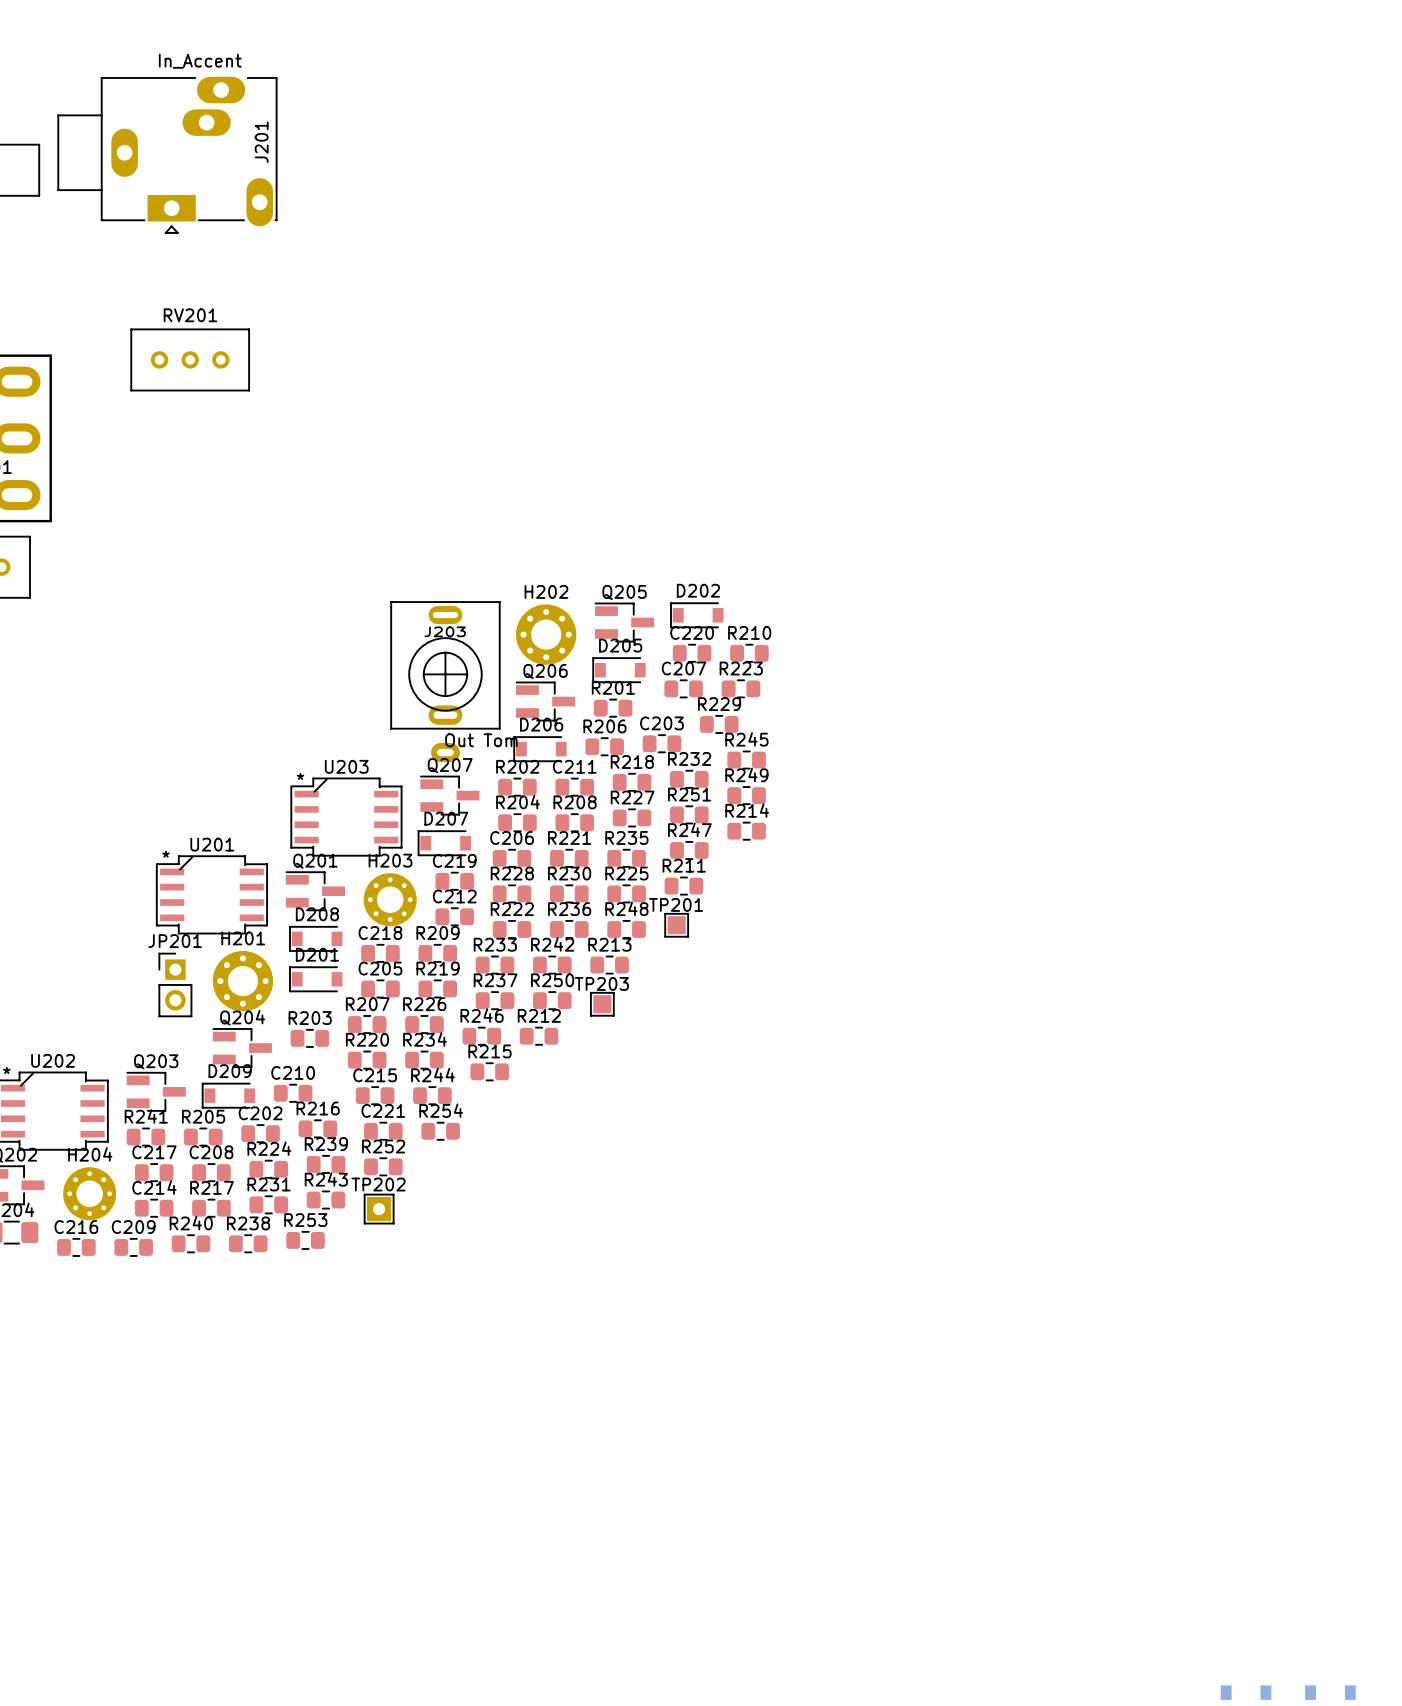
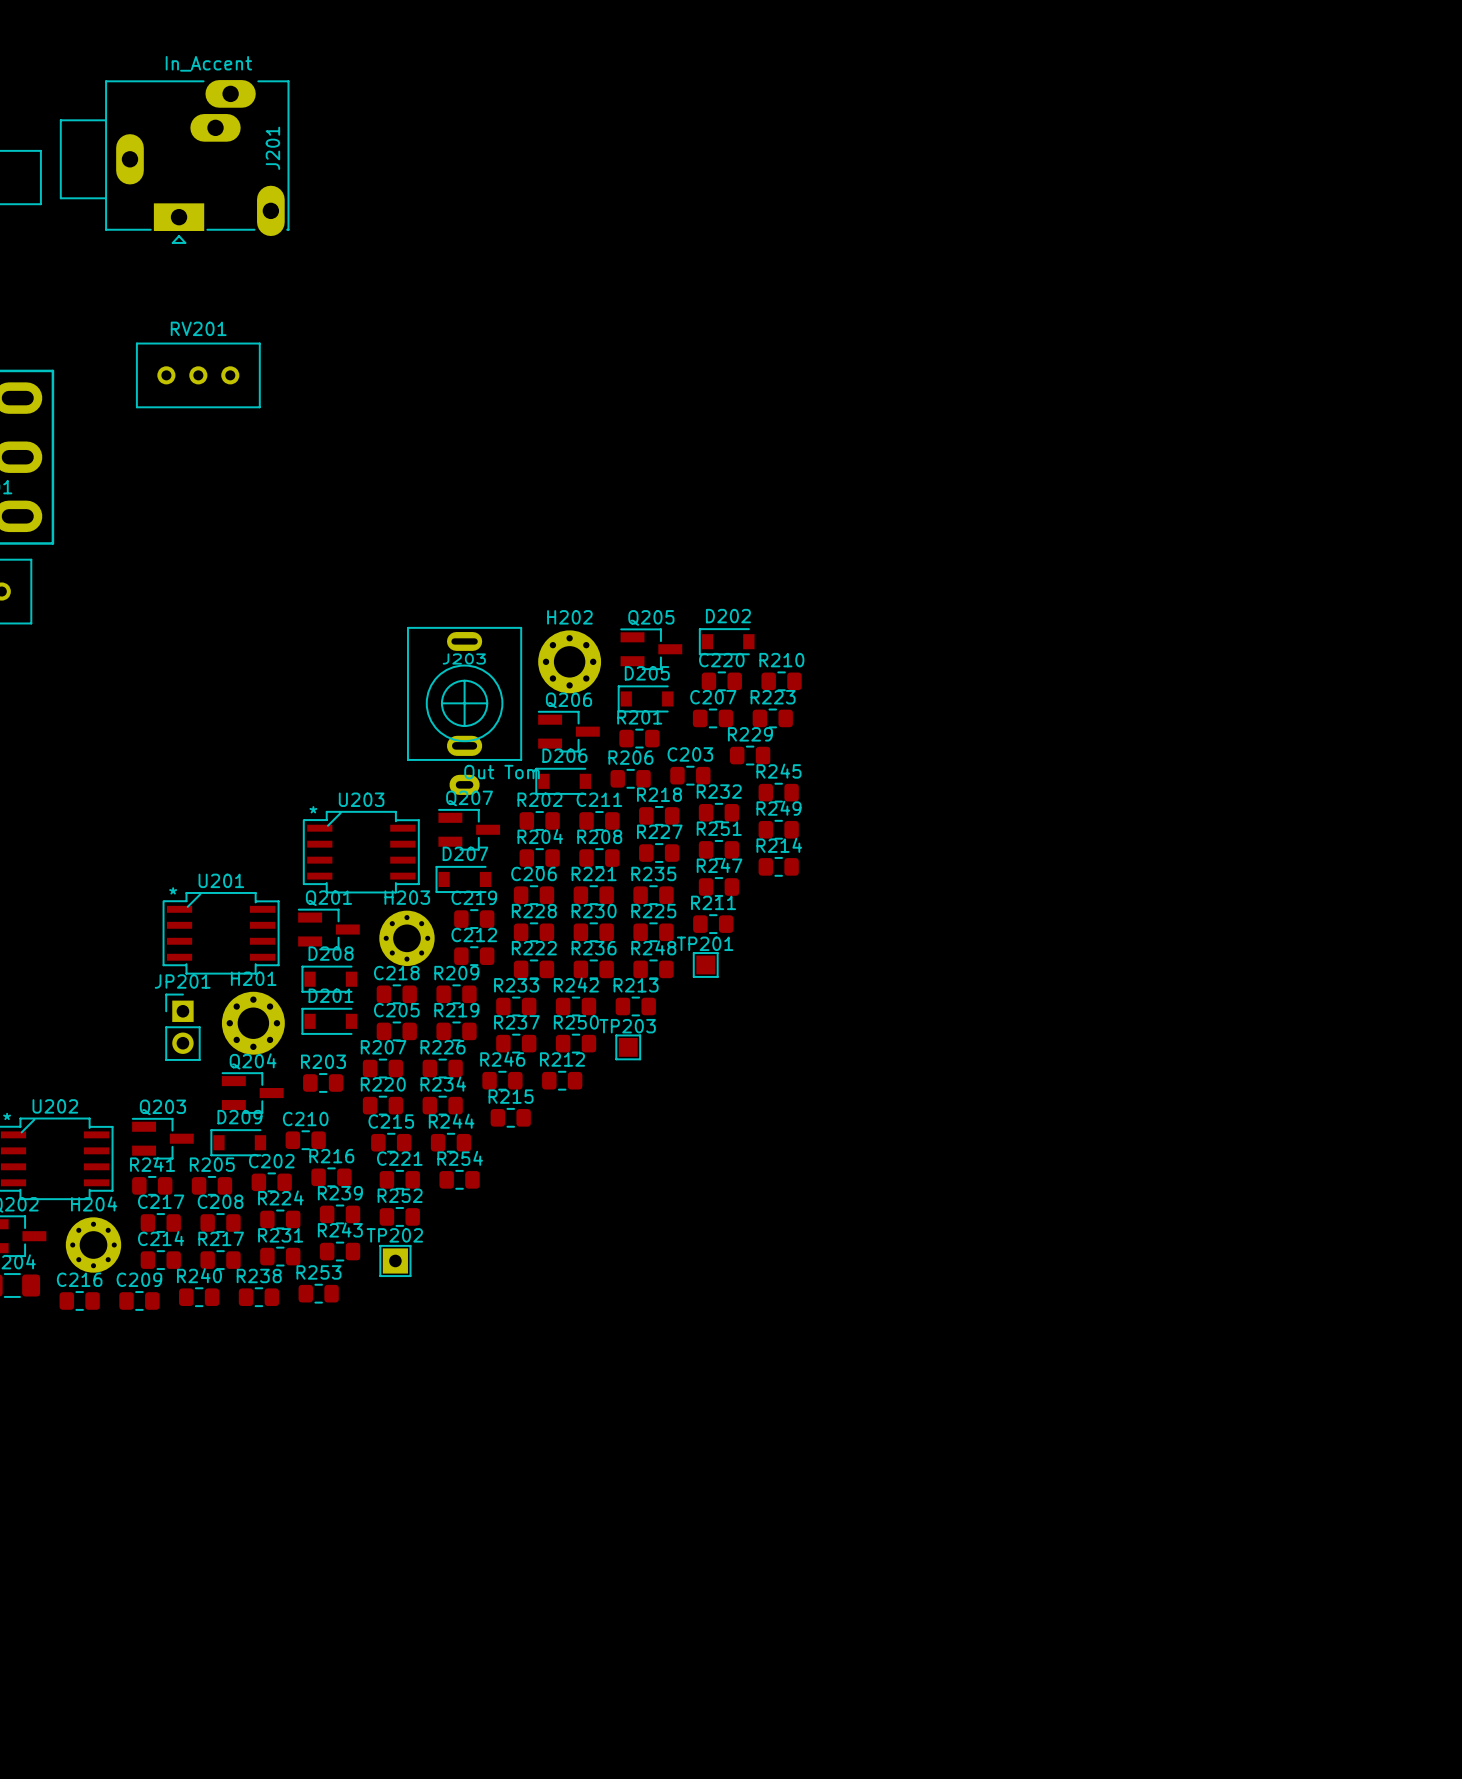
part: (1246, 1692) -> none
part: (1330, 1692) -> none

